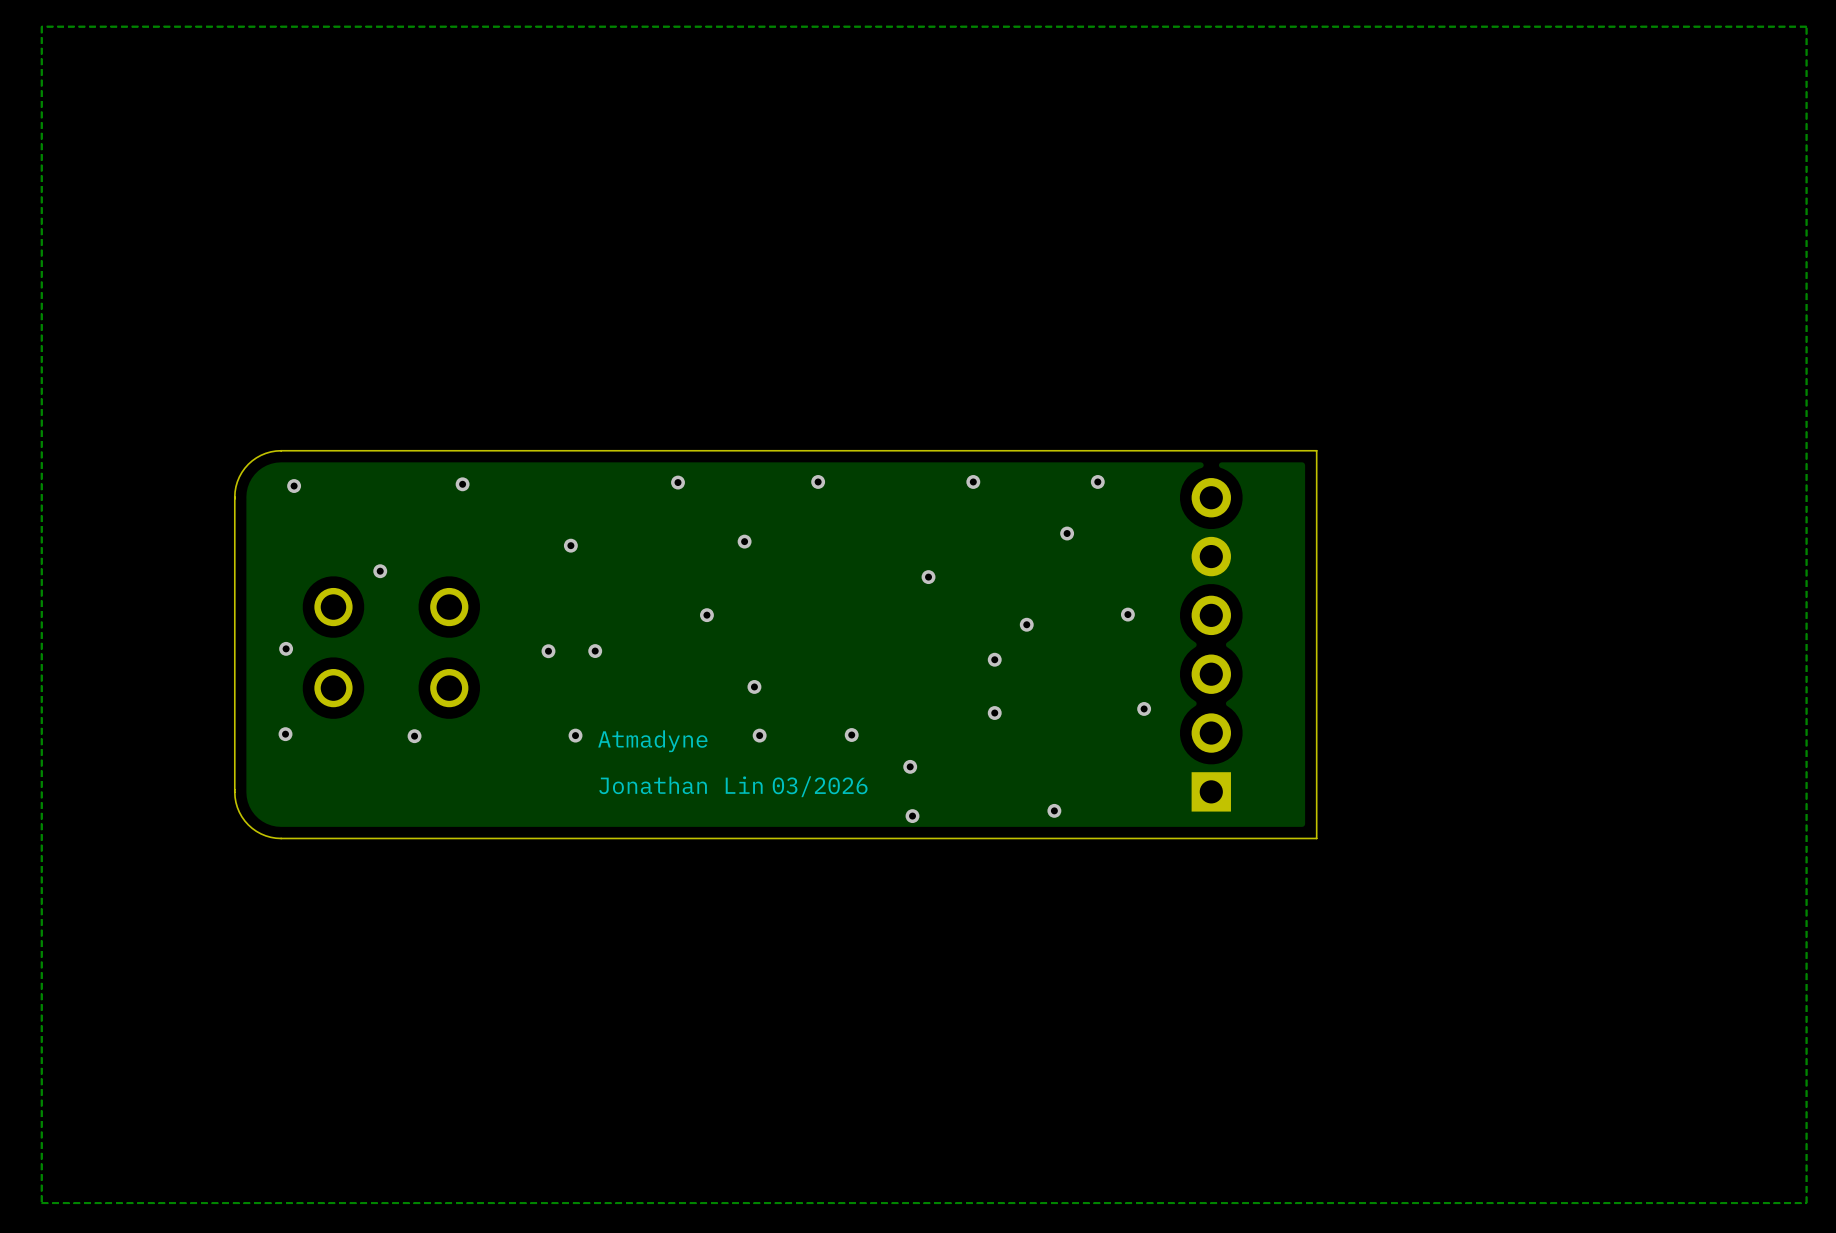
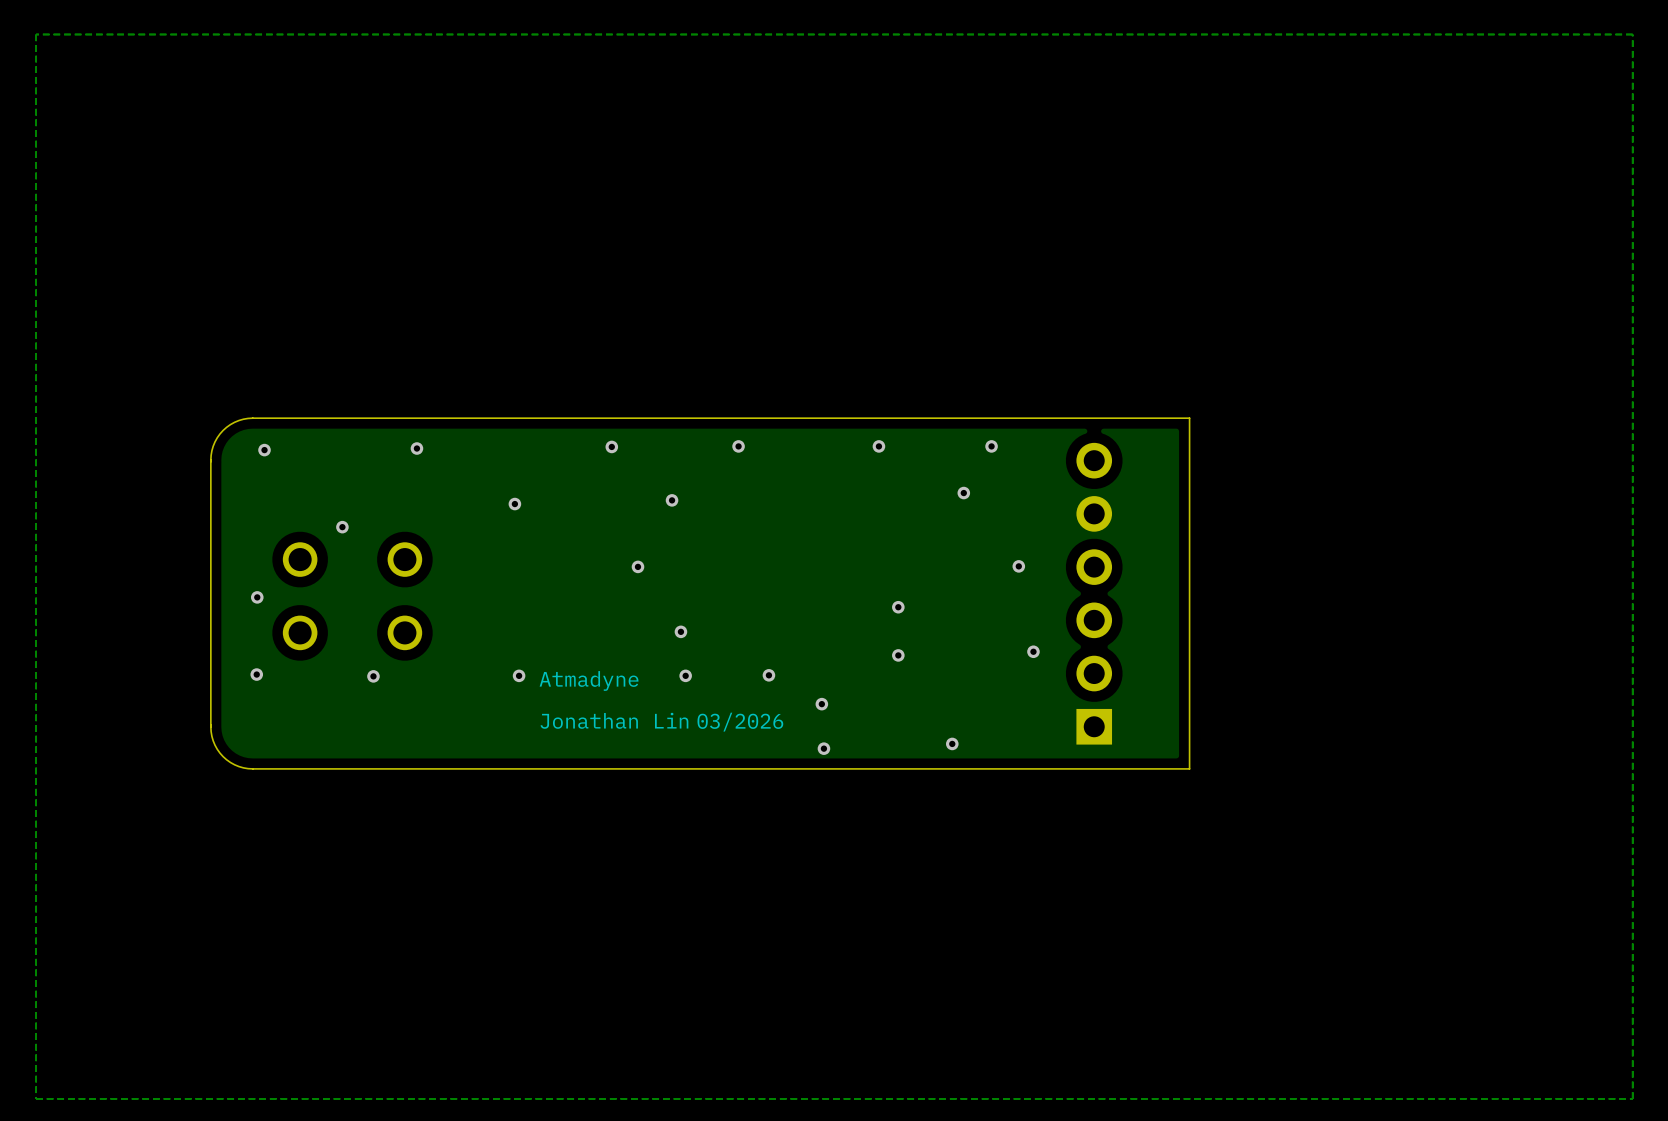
via: (928, 577) -> none
via: (1026, 624) -> none
via: (548, 651) -> none
via: (595, 651) -> none

